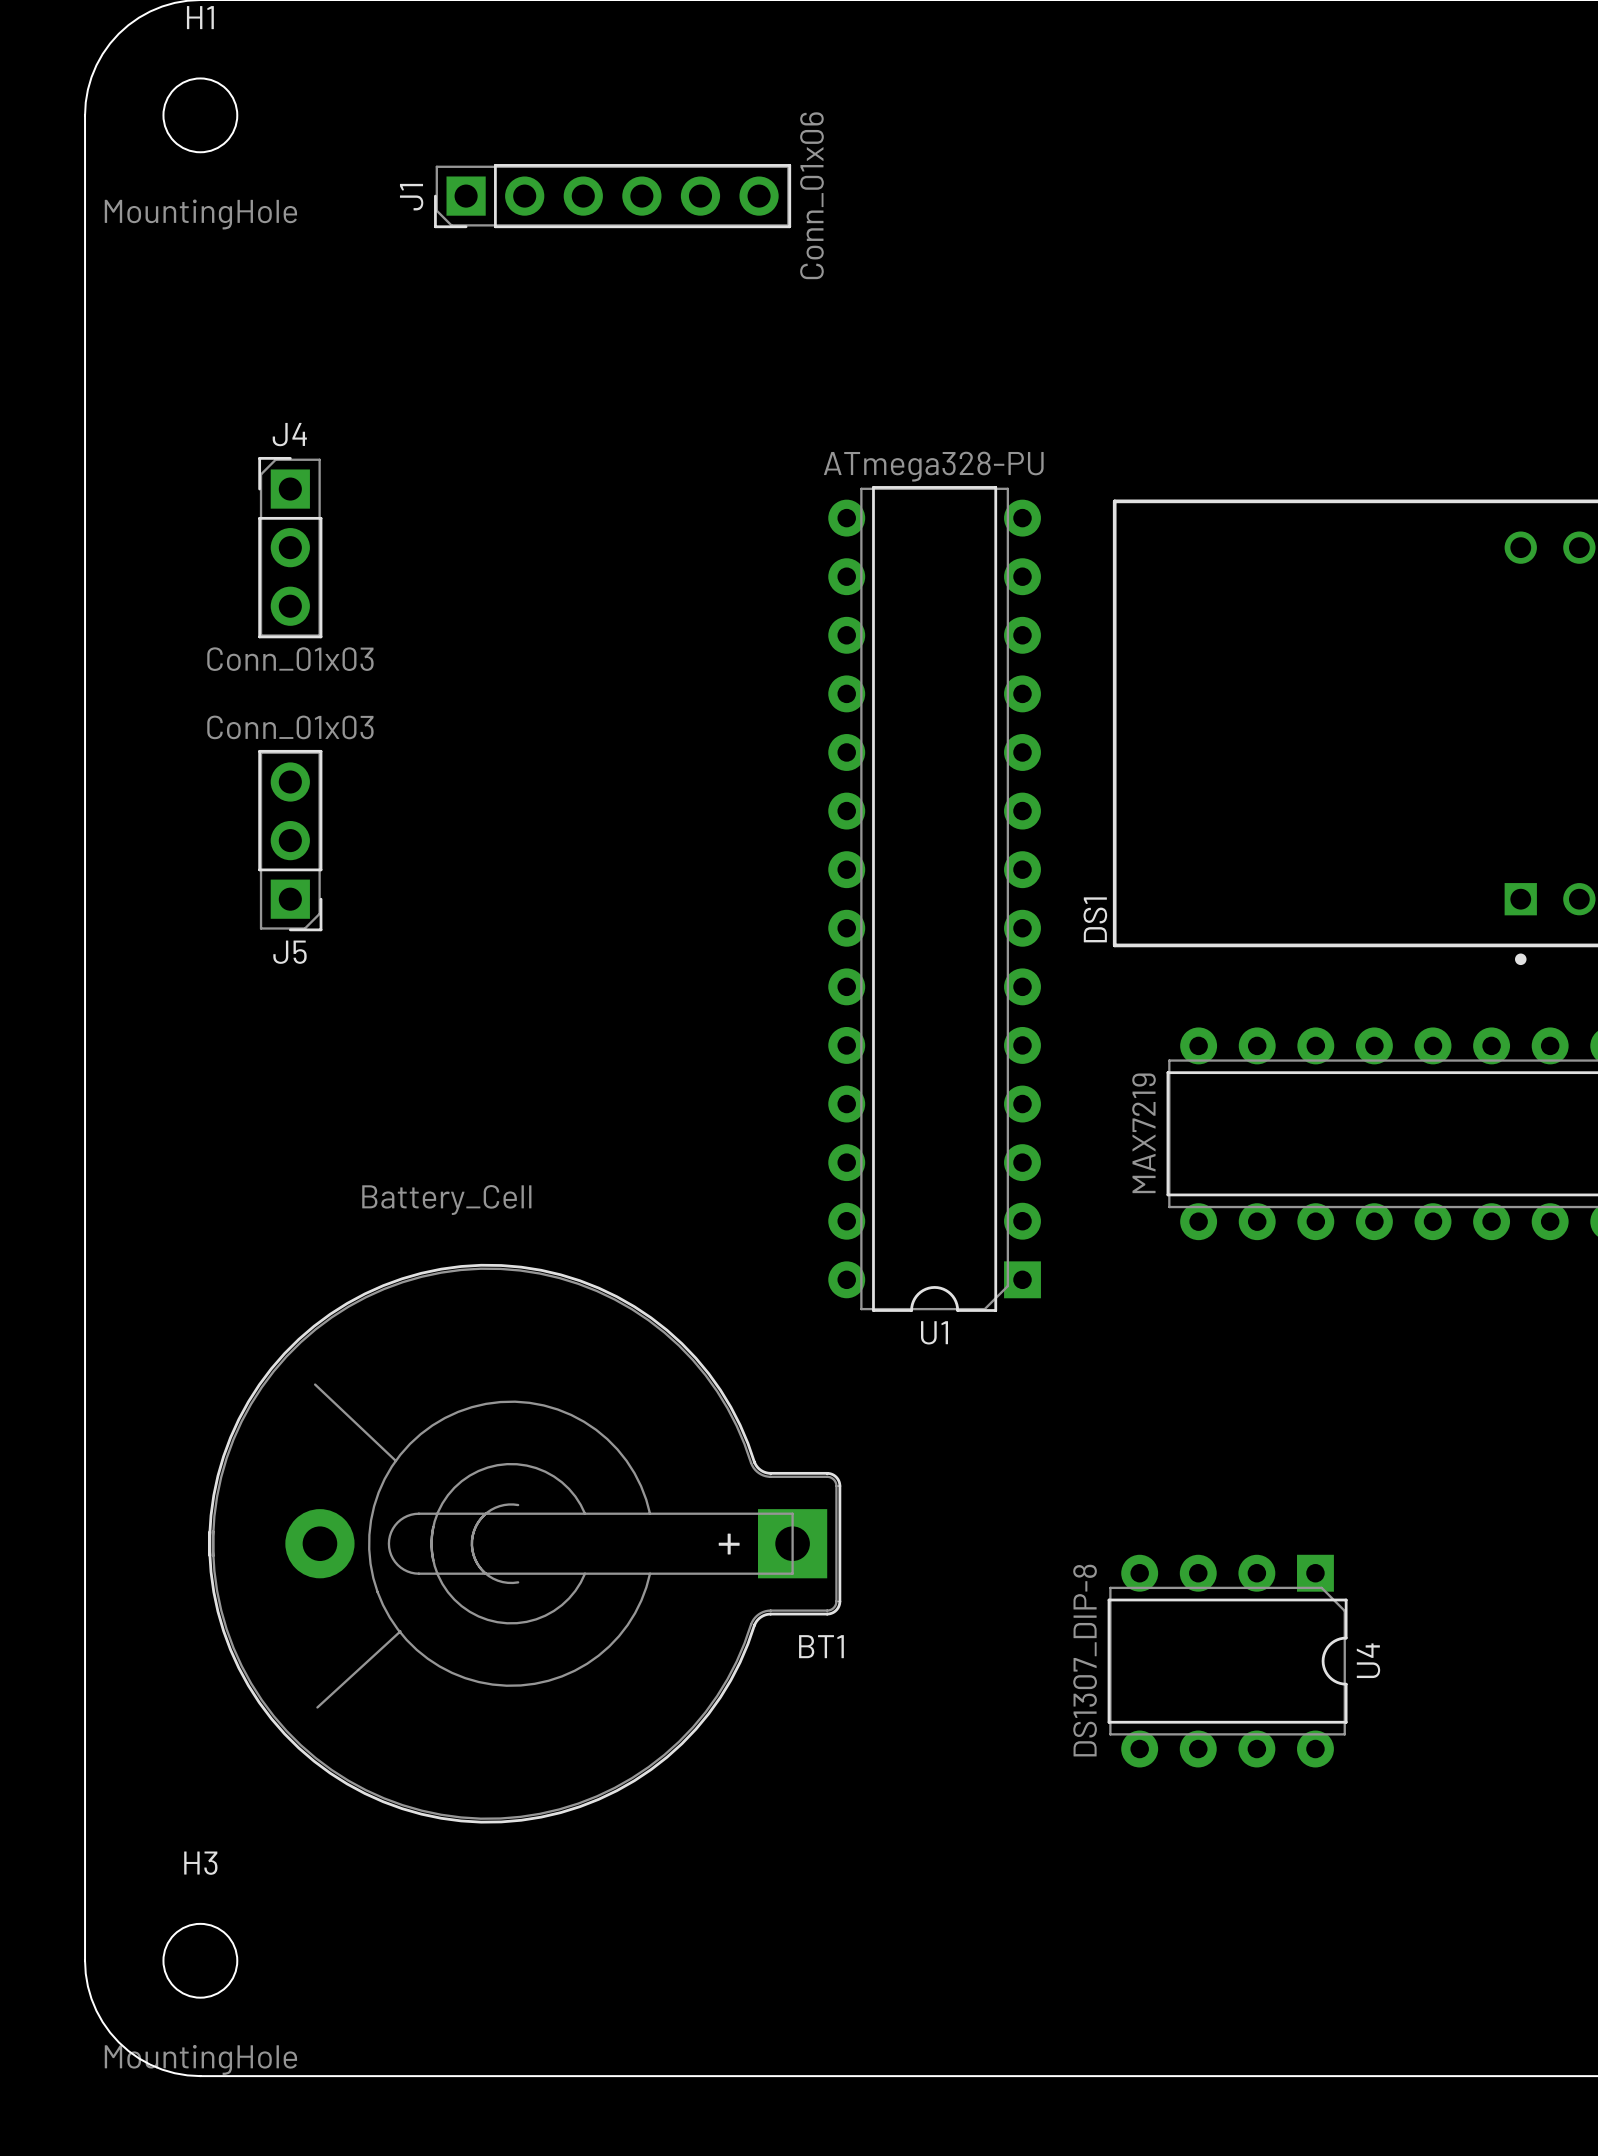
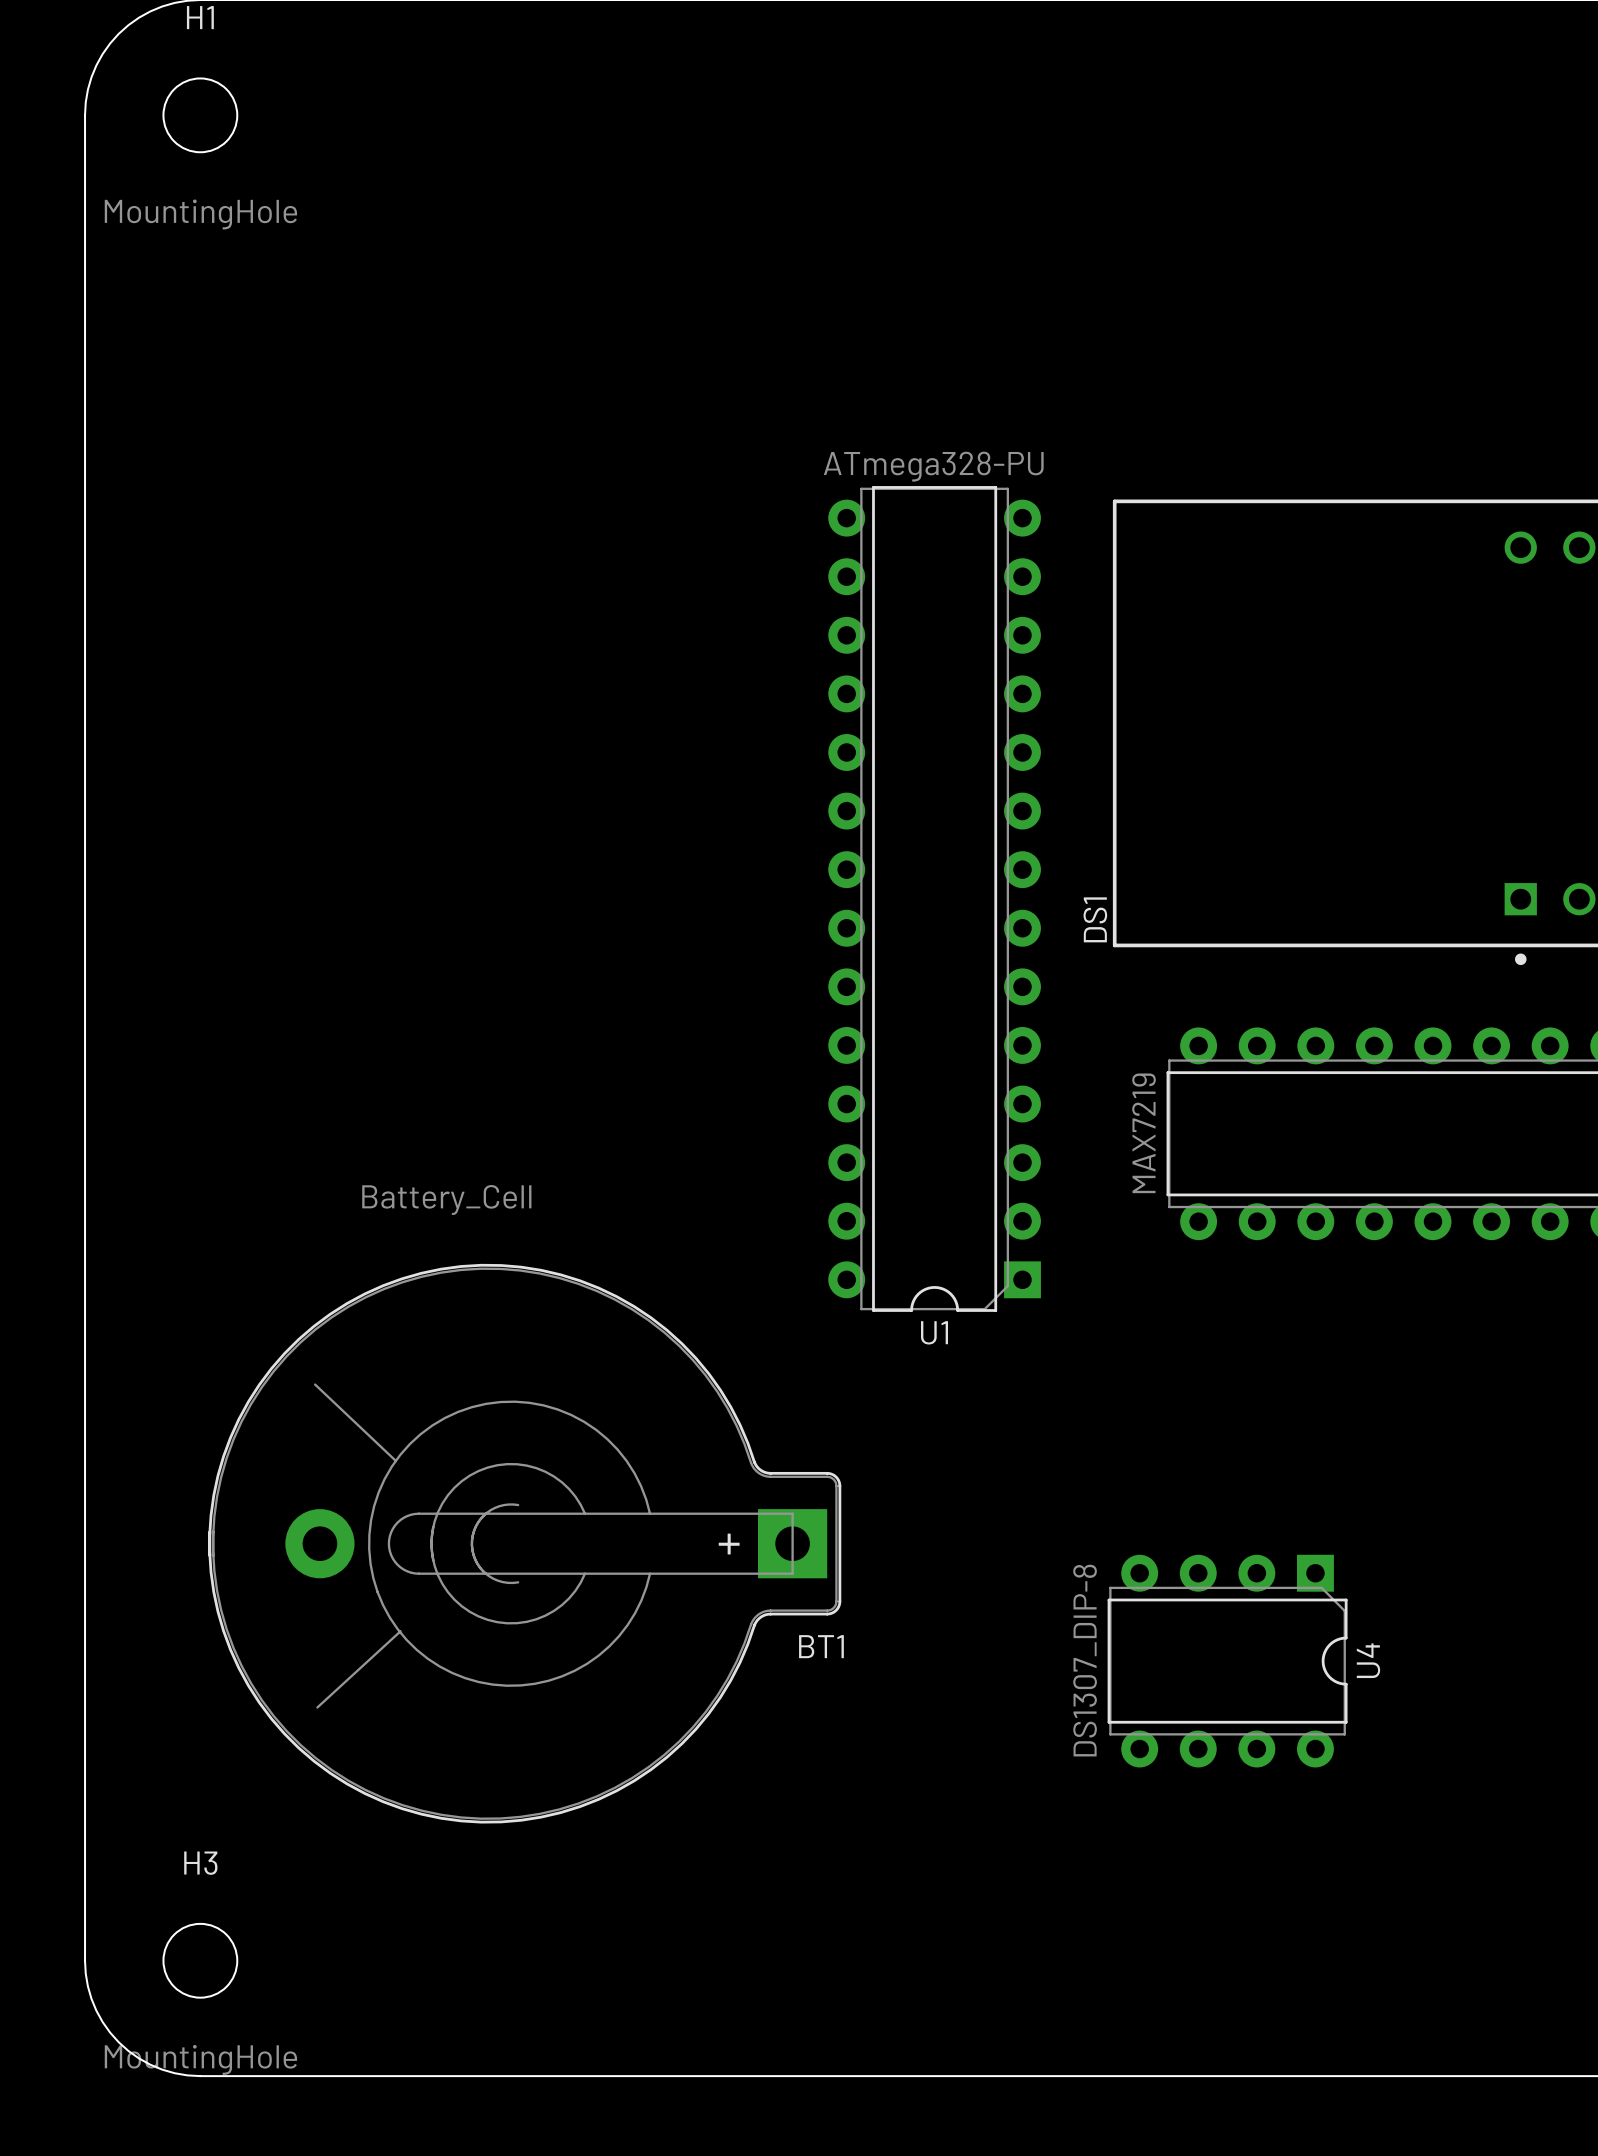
J1: Conn_01x06 (612, 196) -> none
J4: Conn_01x03 (290, 547) -> none
J5: Conn_01x03 (290, 840) -> none

